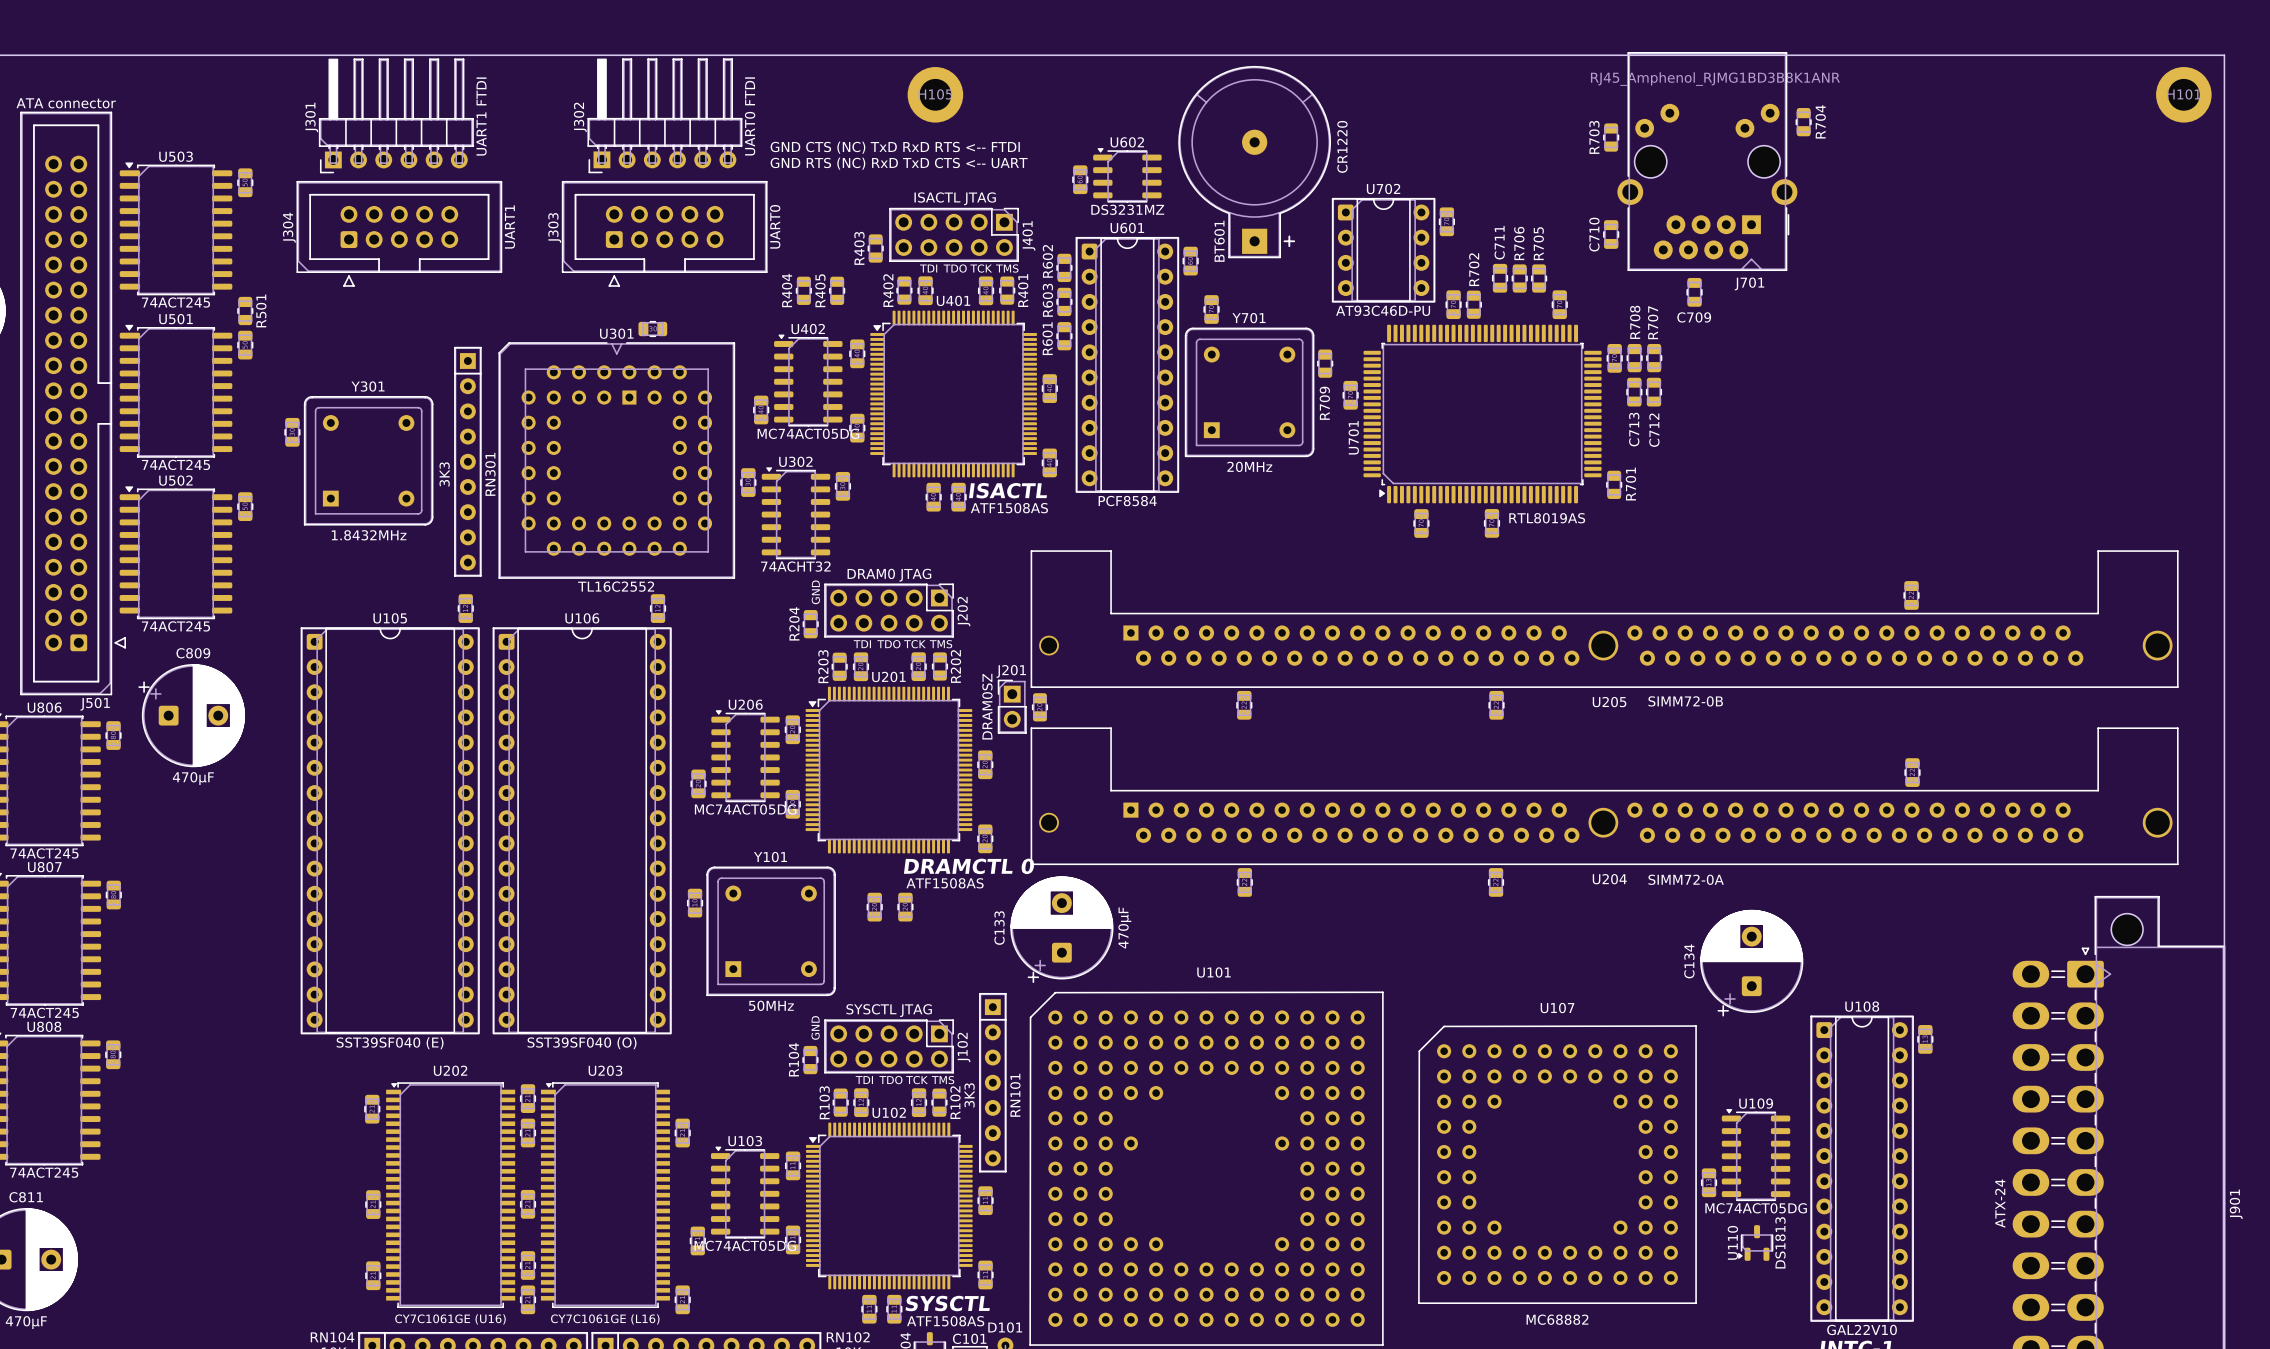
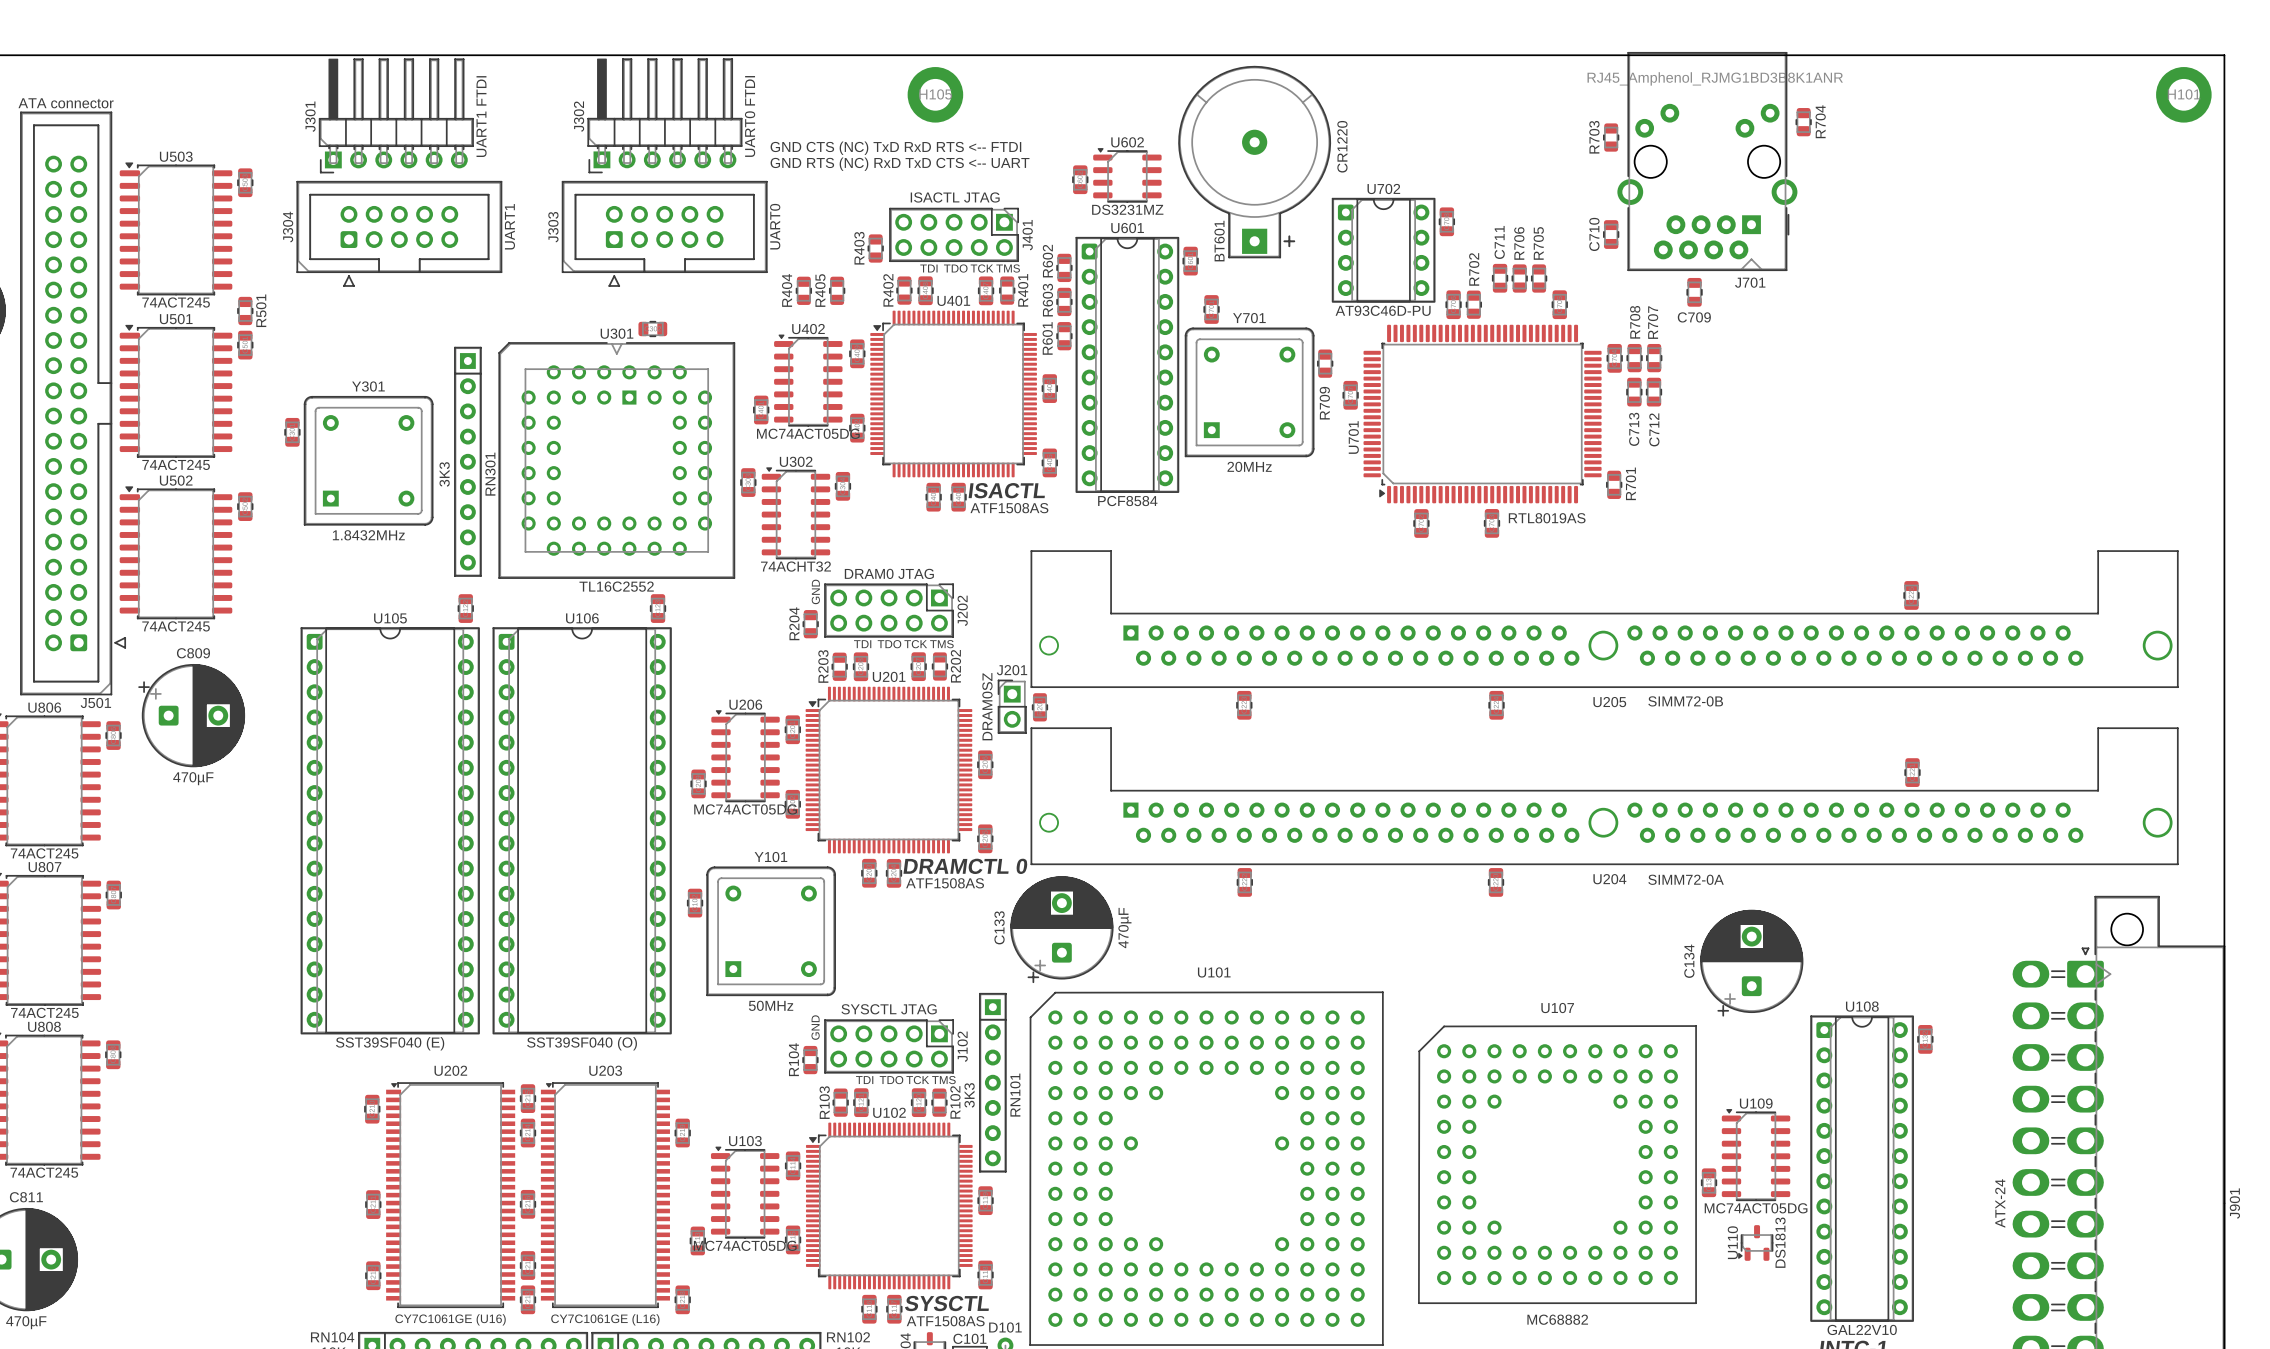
part position: (874, 907) -> (869, 873)
part position: (905, 907) -> (893, 873)

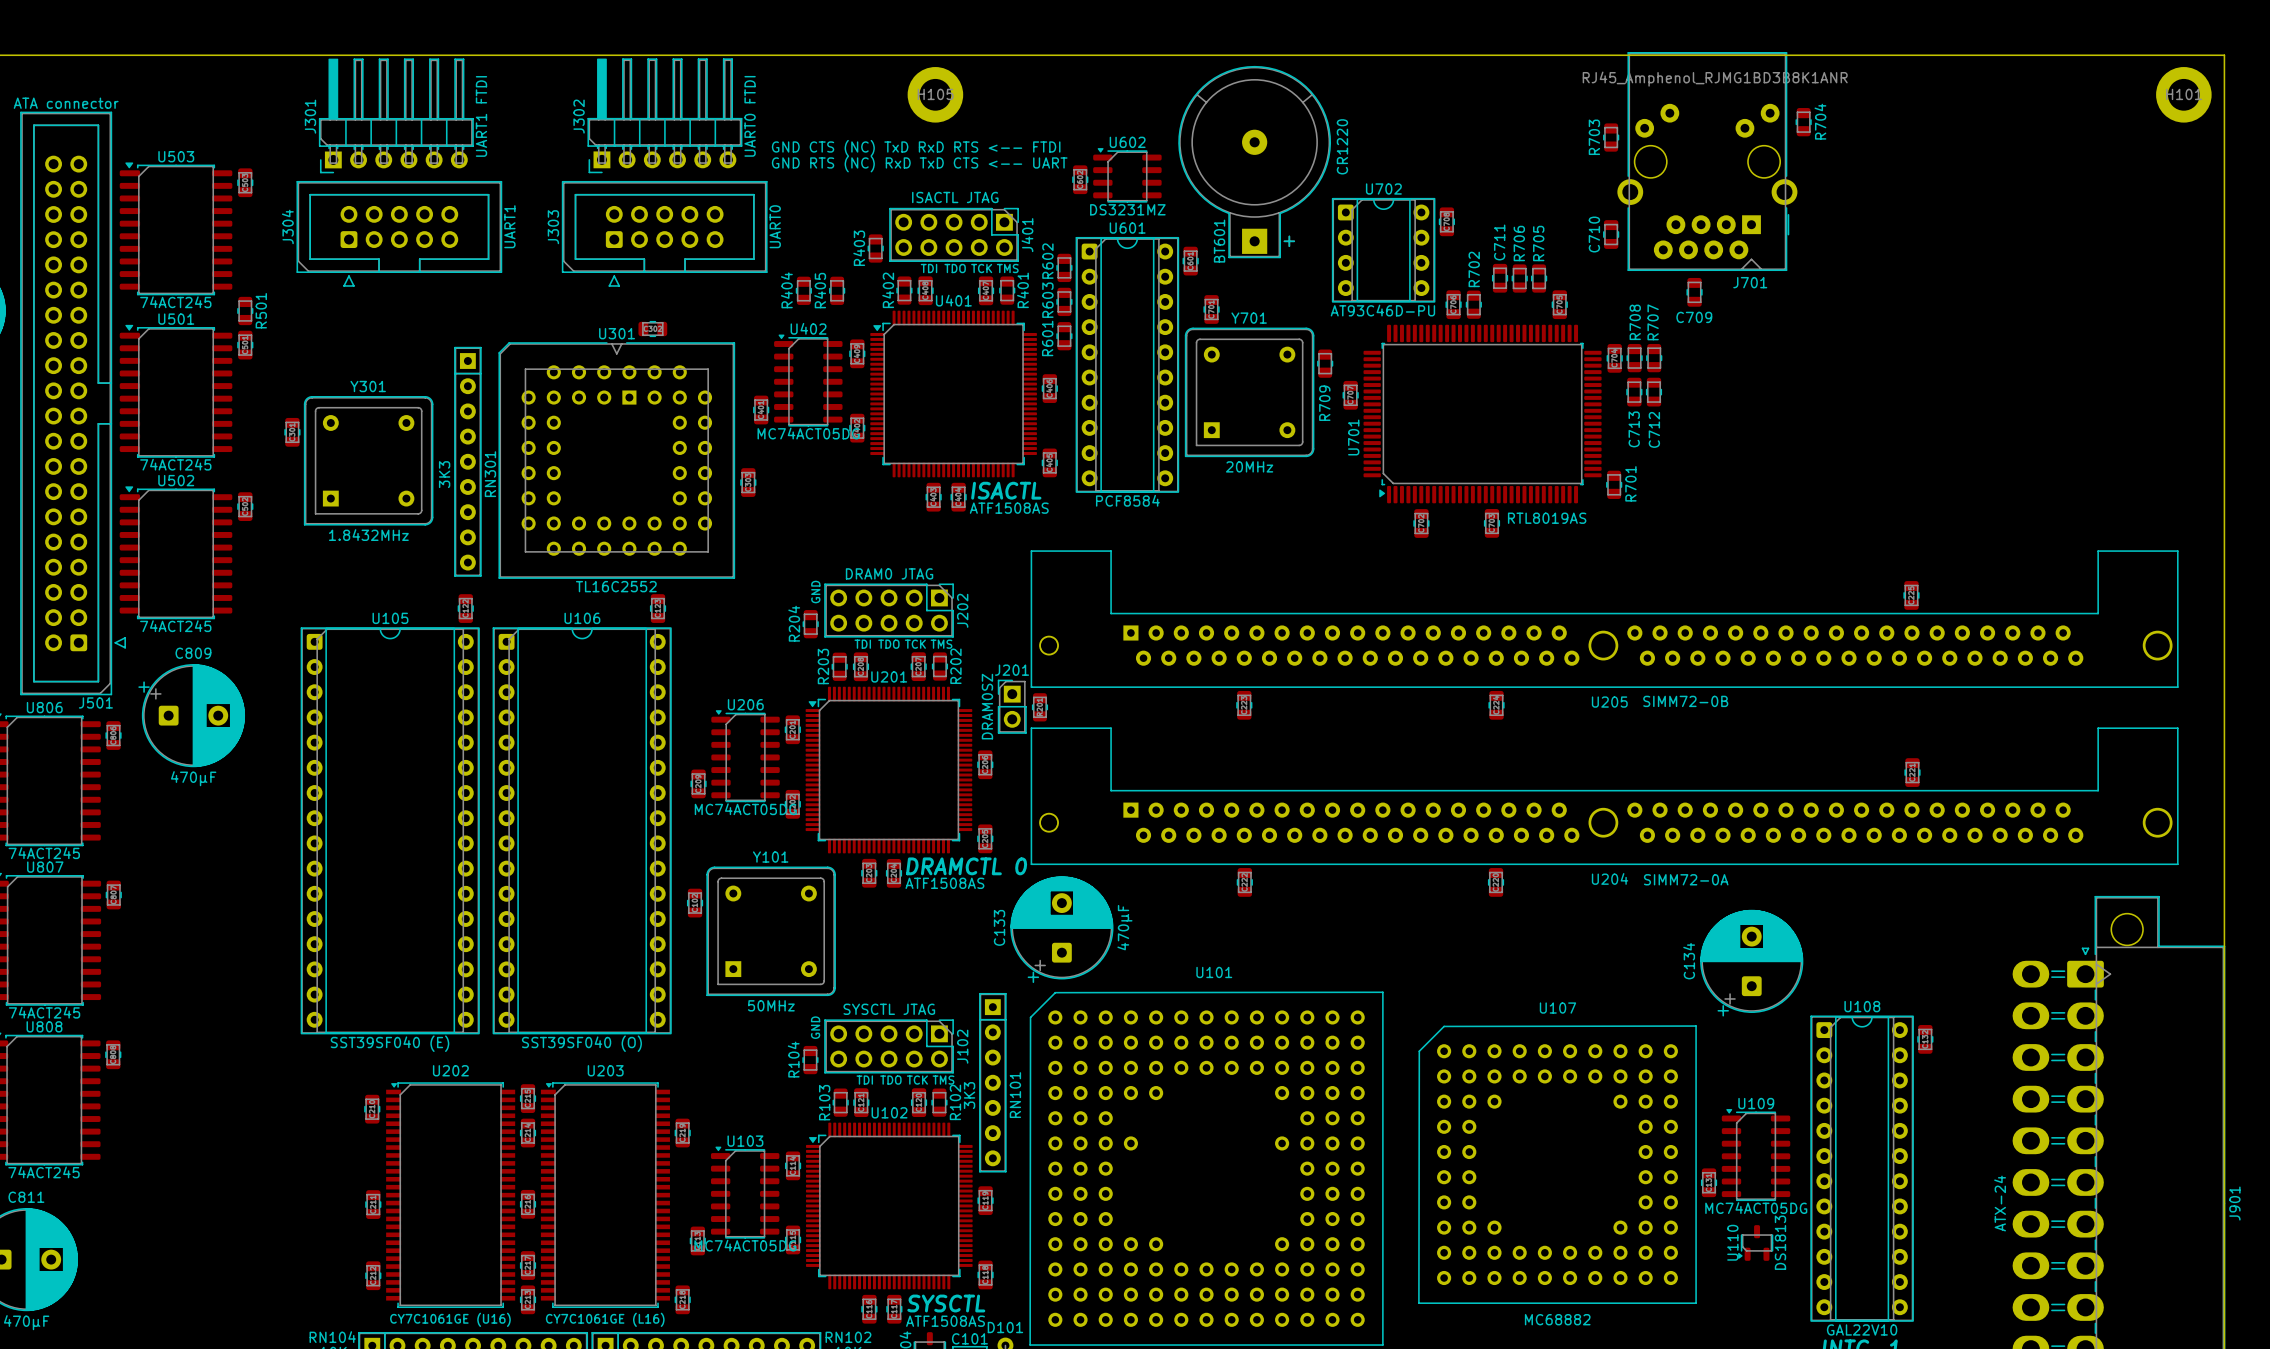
part: (842, 486) -> none
U302: 74ACHT32 (795, 513) -> none

